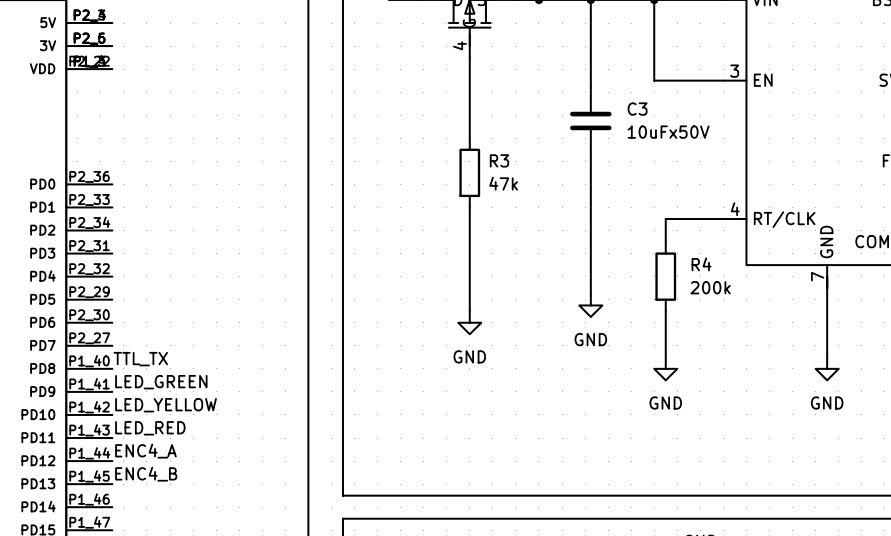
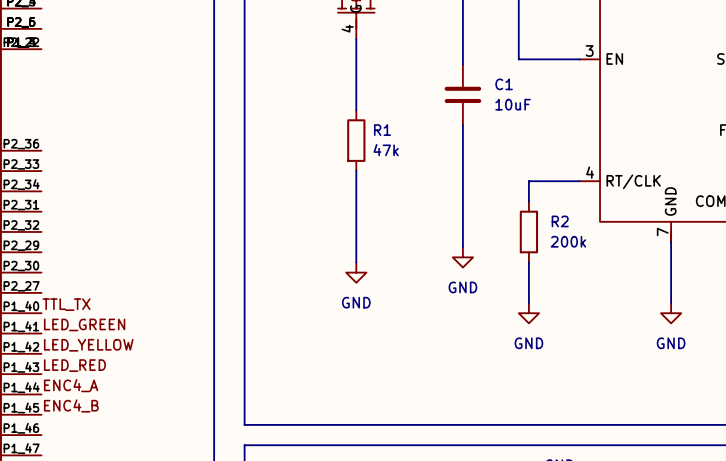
C3 name: C3 (637, 109) -> C1 (504, 84)
C3 value: 10uFx50V (668, 132) -> 10uF (513, 104)
R3 name: R3 (499, 160) -> R1 (382, 130)
R4 name: R4 (701, 264) -> R2 (560, 221)

